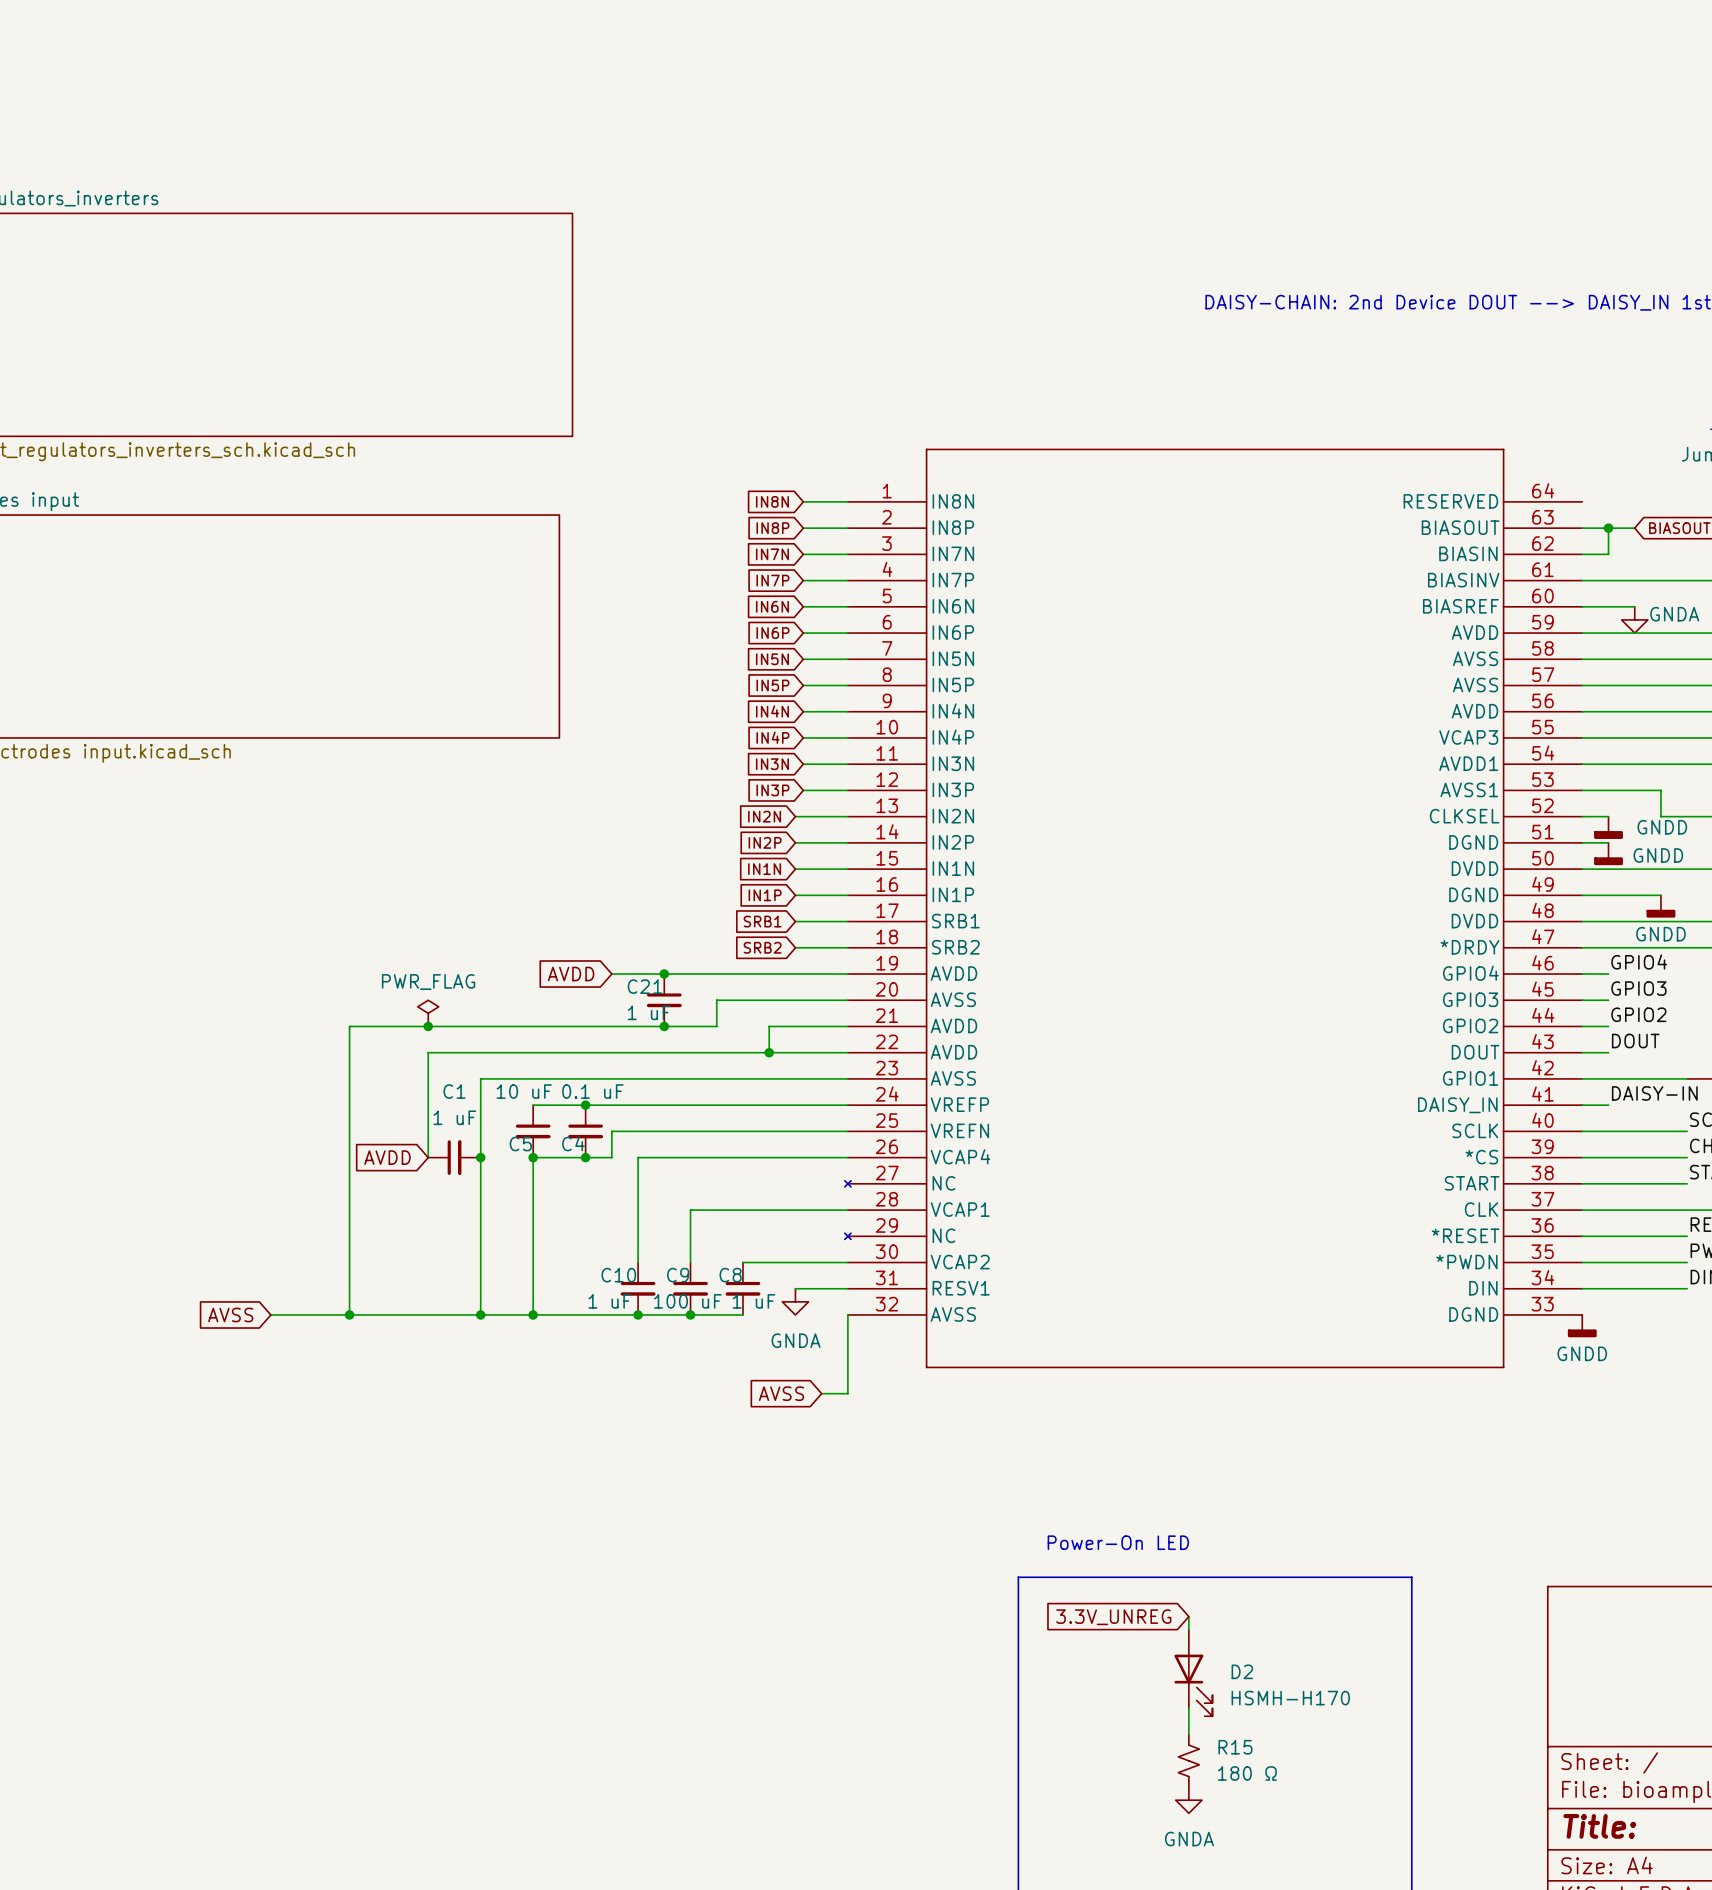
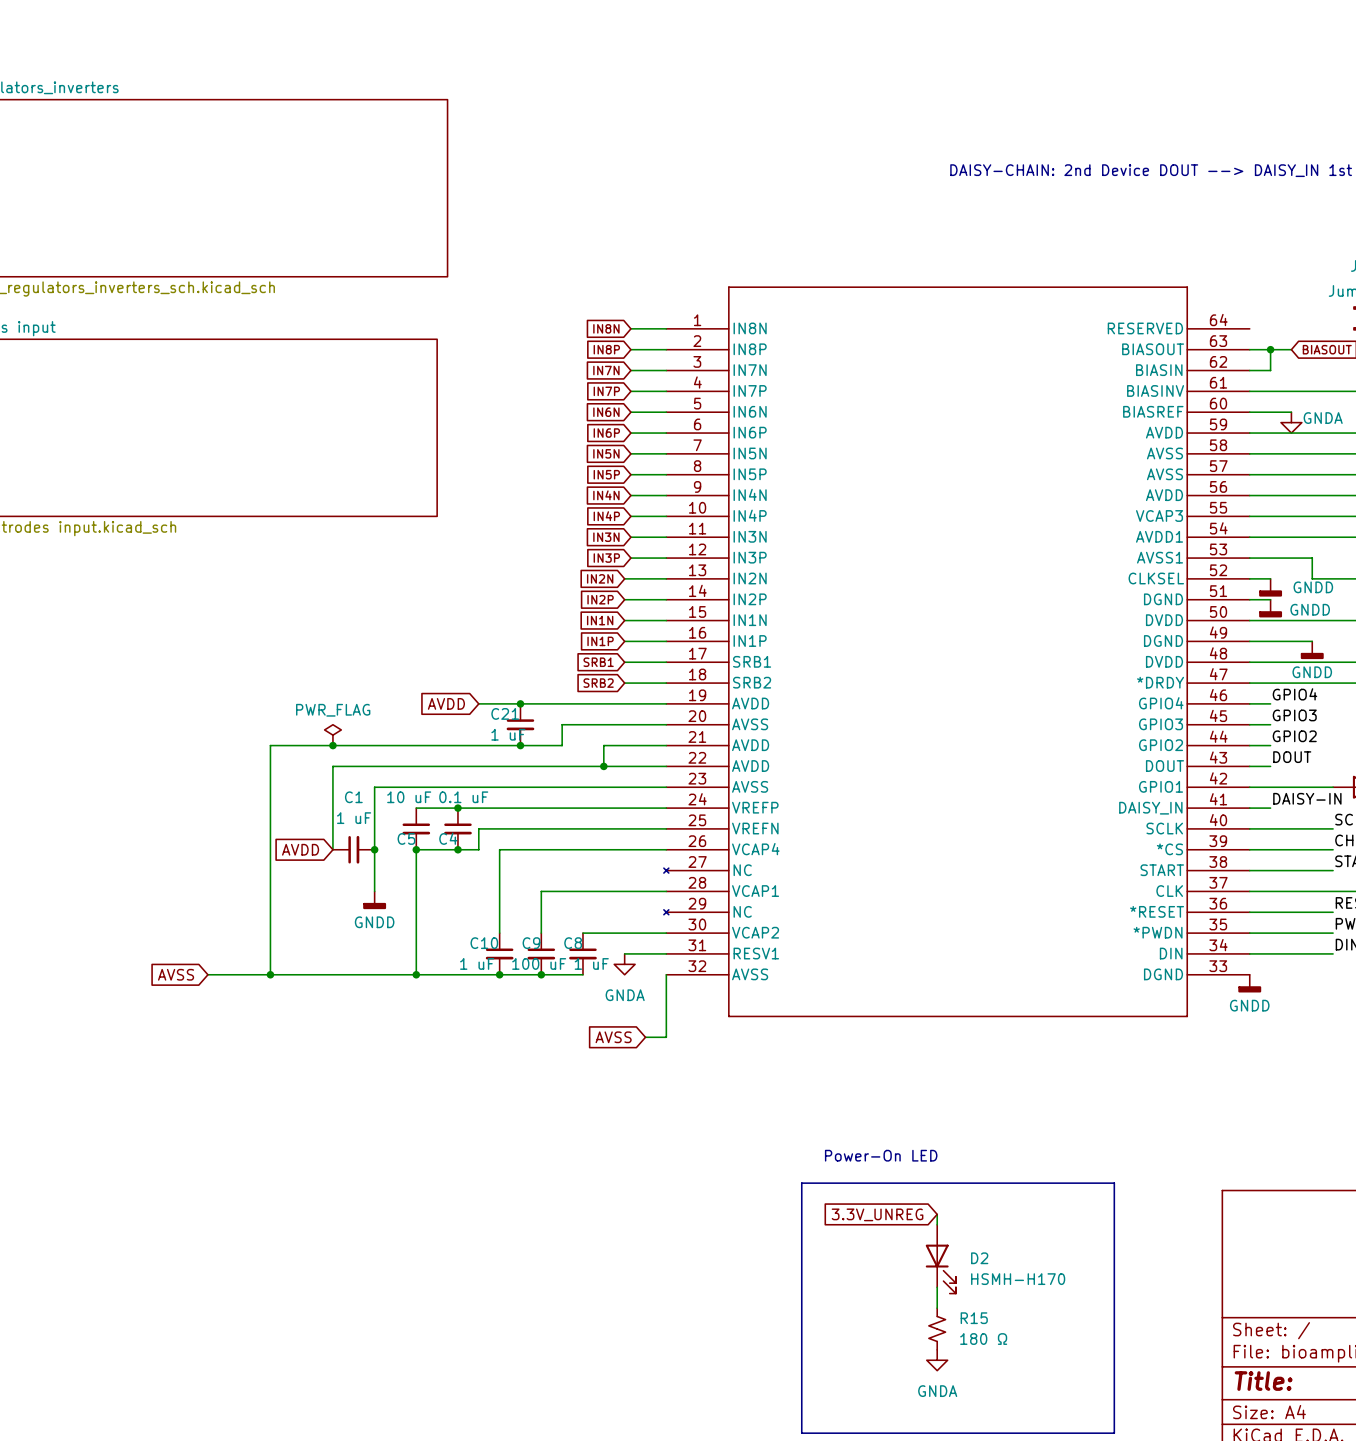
wire: (480, 1210) (480, 1314) -> none
power symbol: none -> GNDD (374, 900)
junction: (480, 1314) -> none

